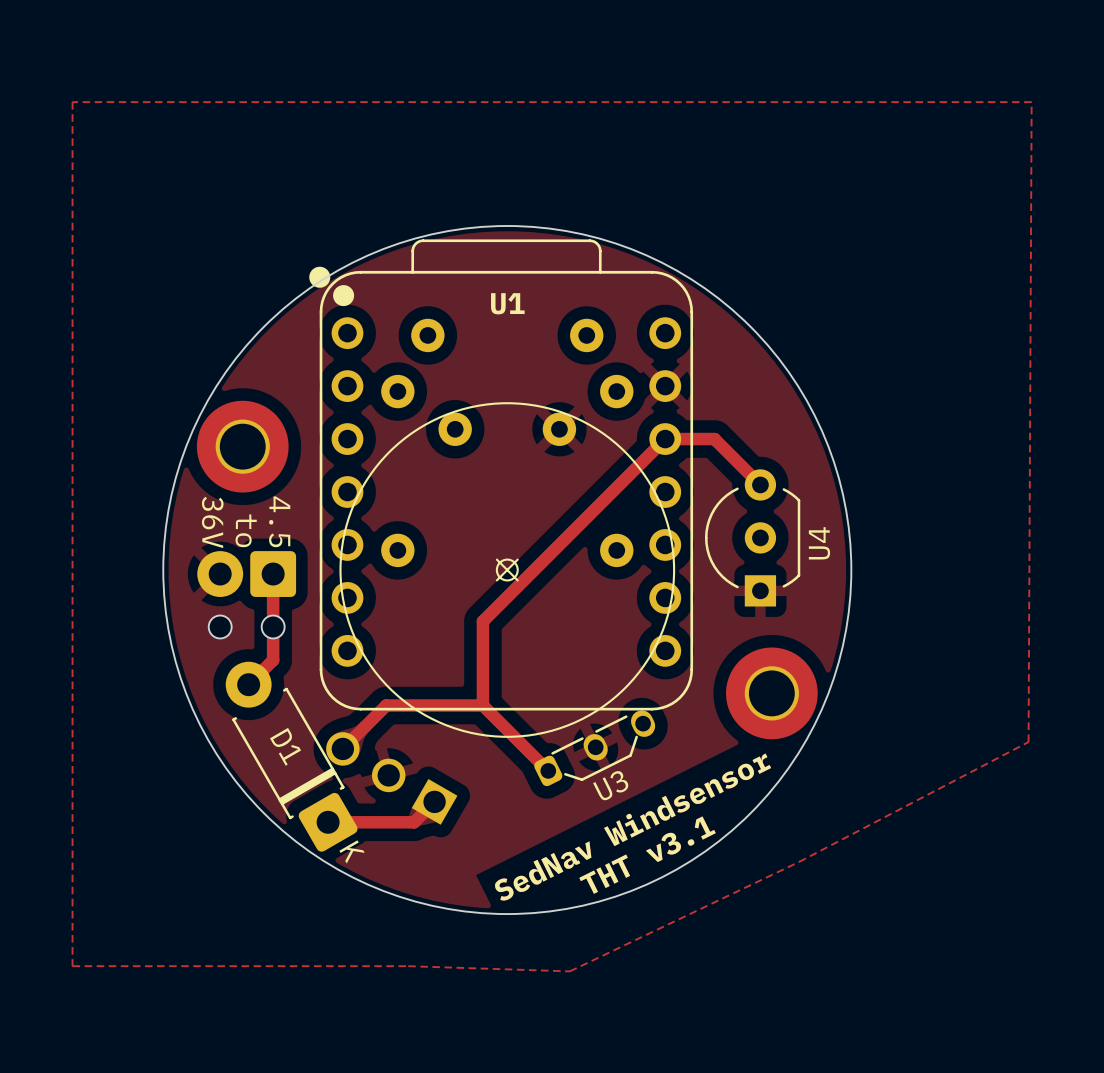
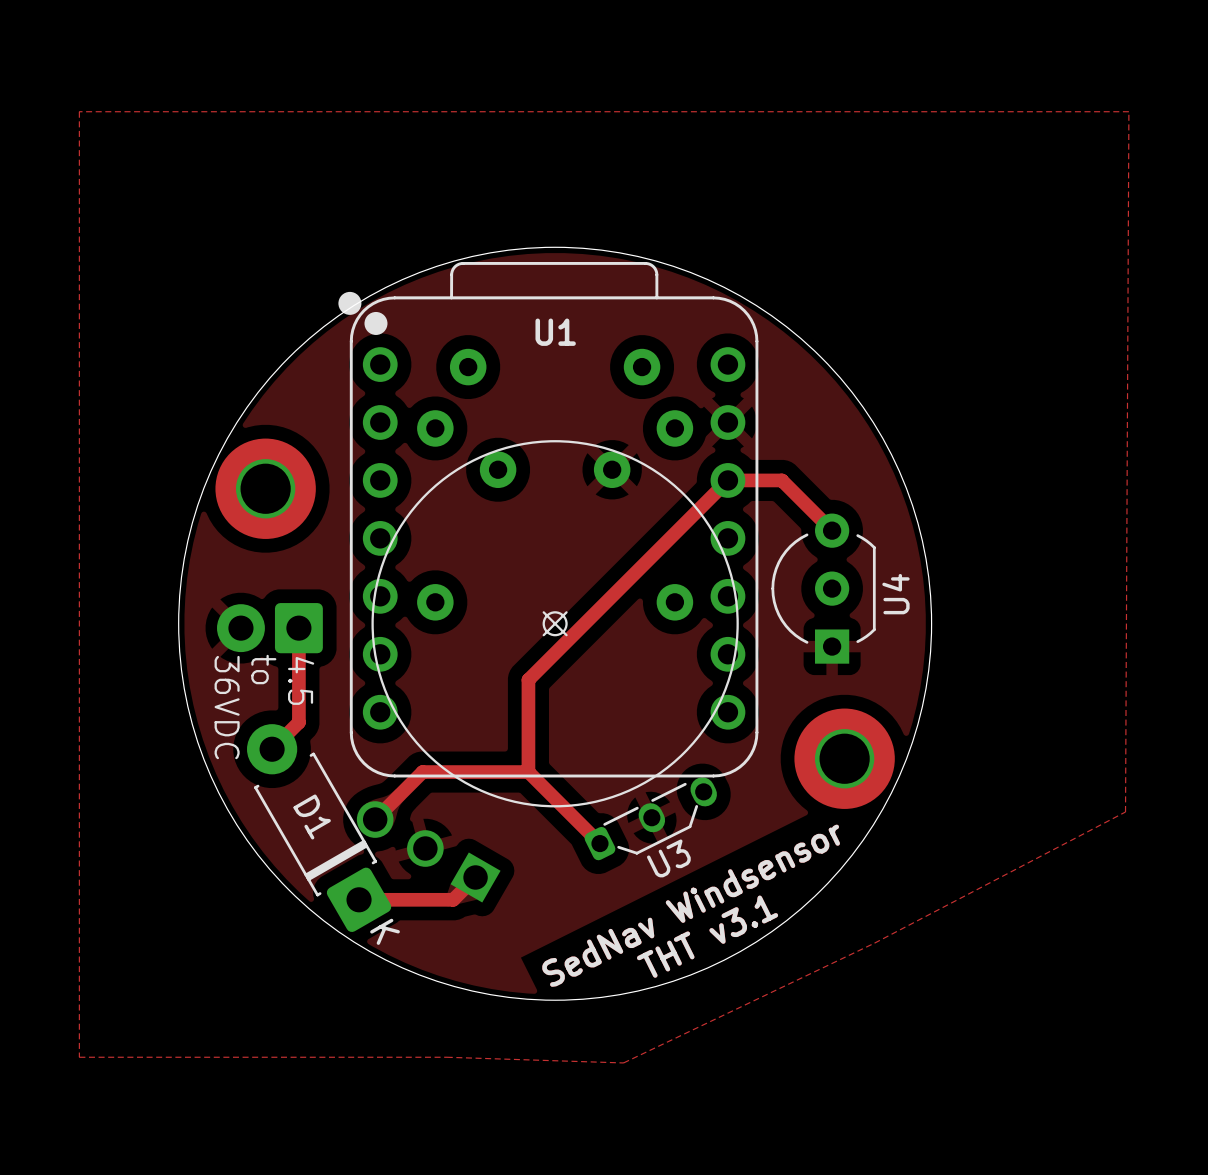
text position: 4.5 (279, 521) -> 4.5 (301, 680)
text: 36V (212, 522) -> none
text position: to (246, 530) -> to (263, 669)
part footprint: [197, 551, 297, 639] -> [217, 603, 323, 654]
text: none -> 36VDC (227, 707)

